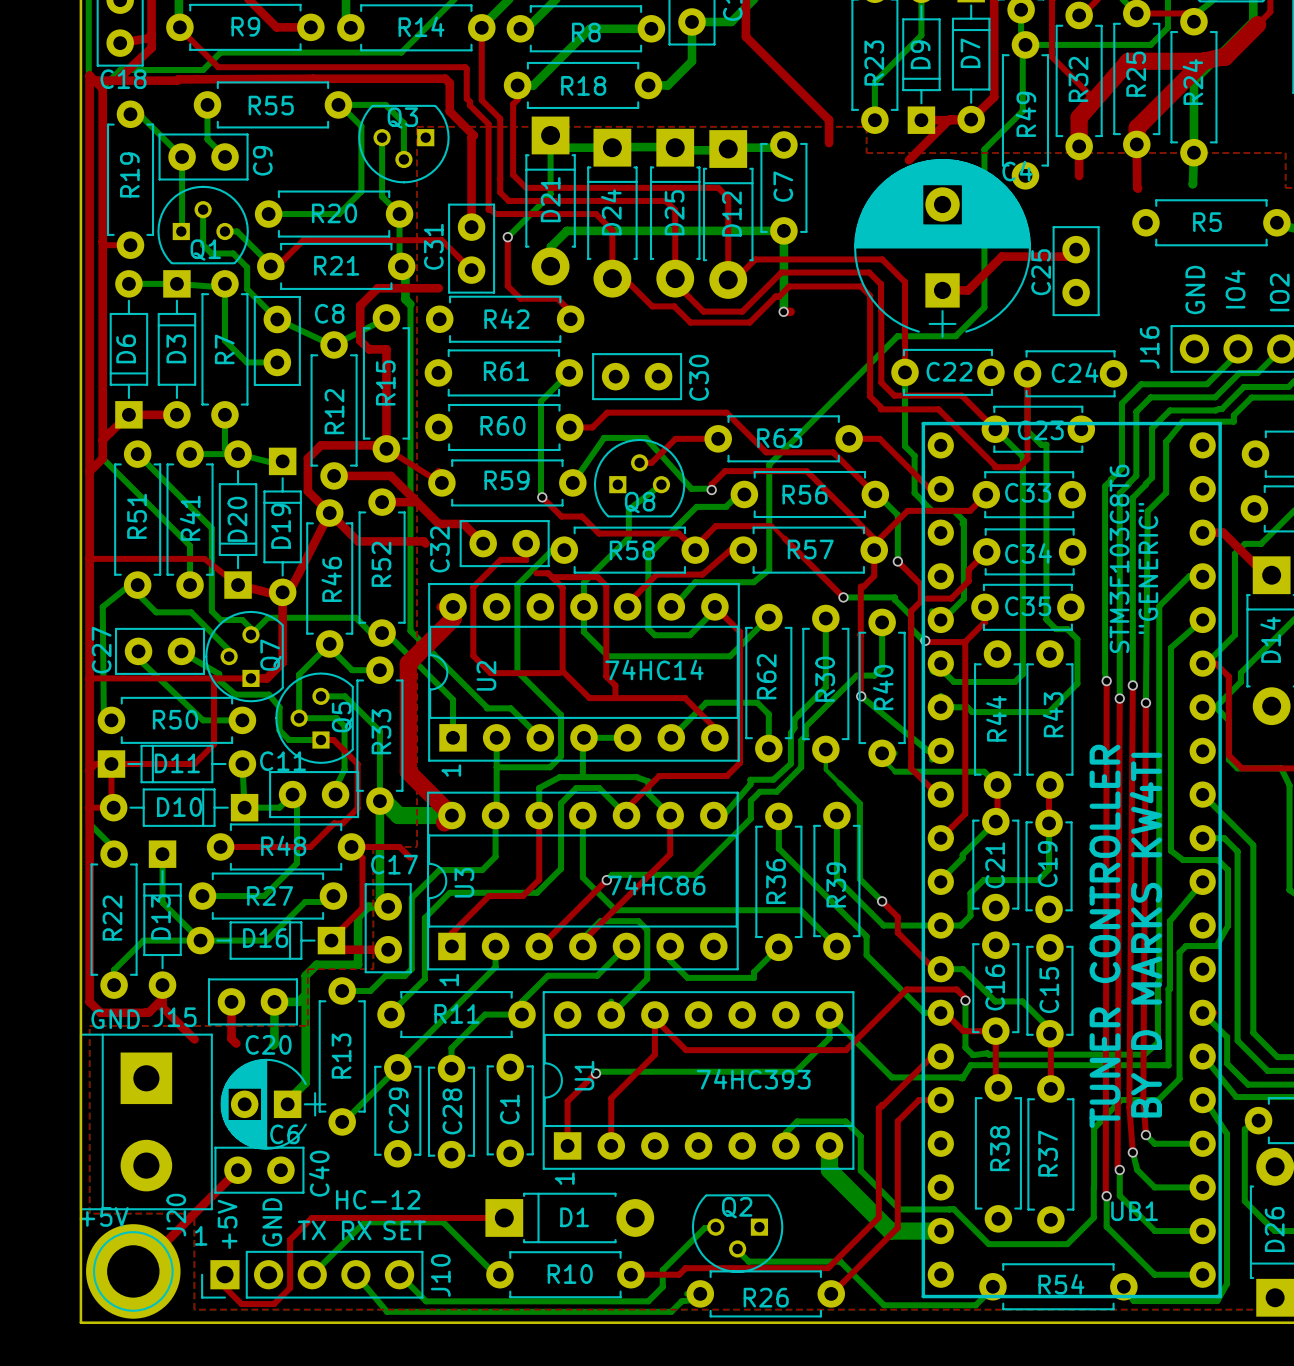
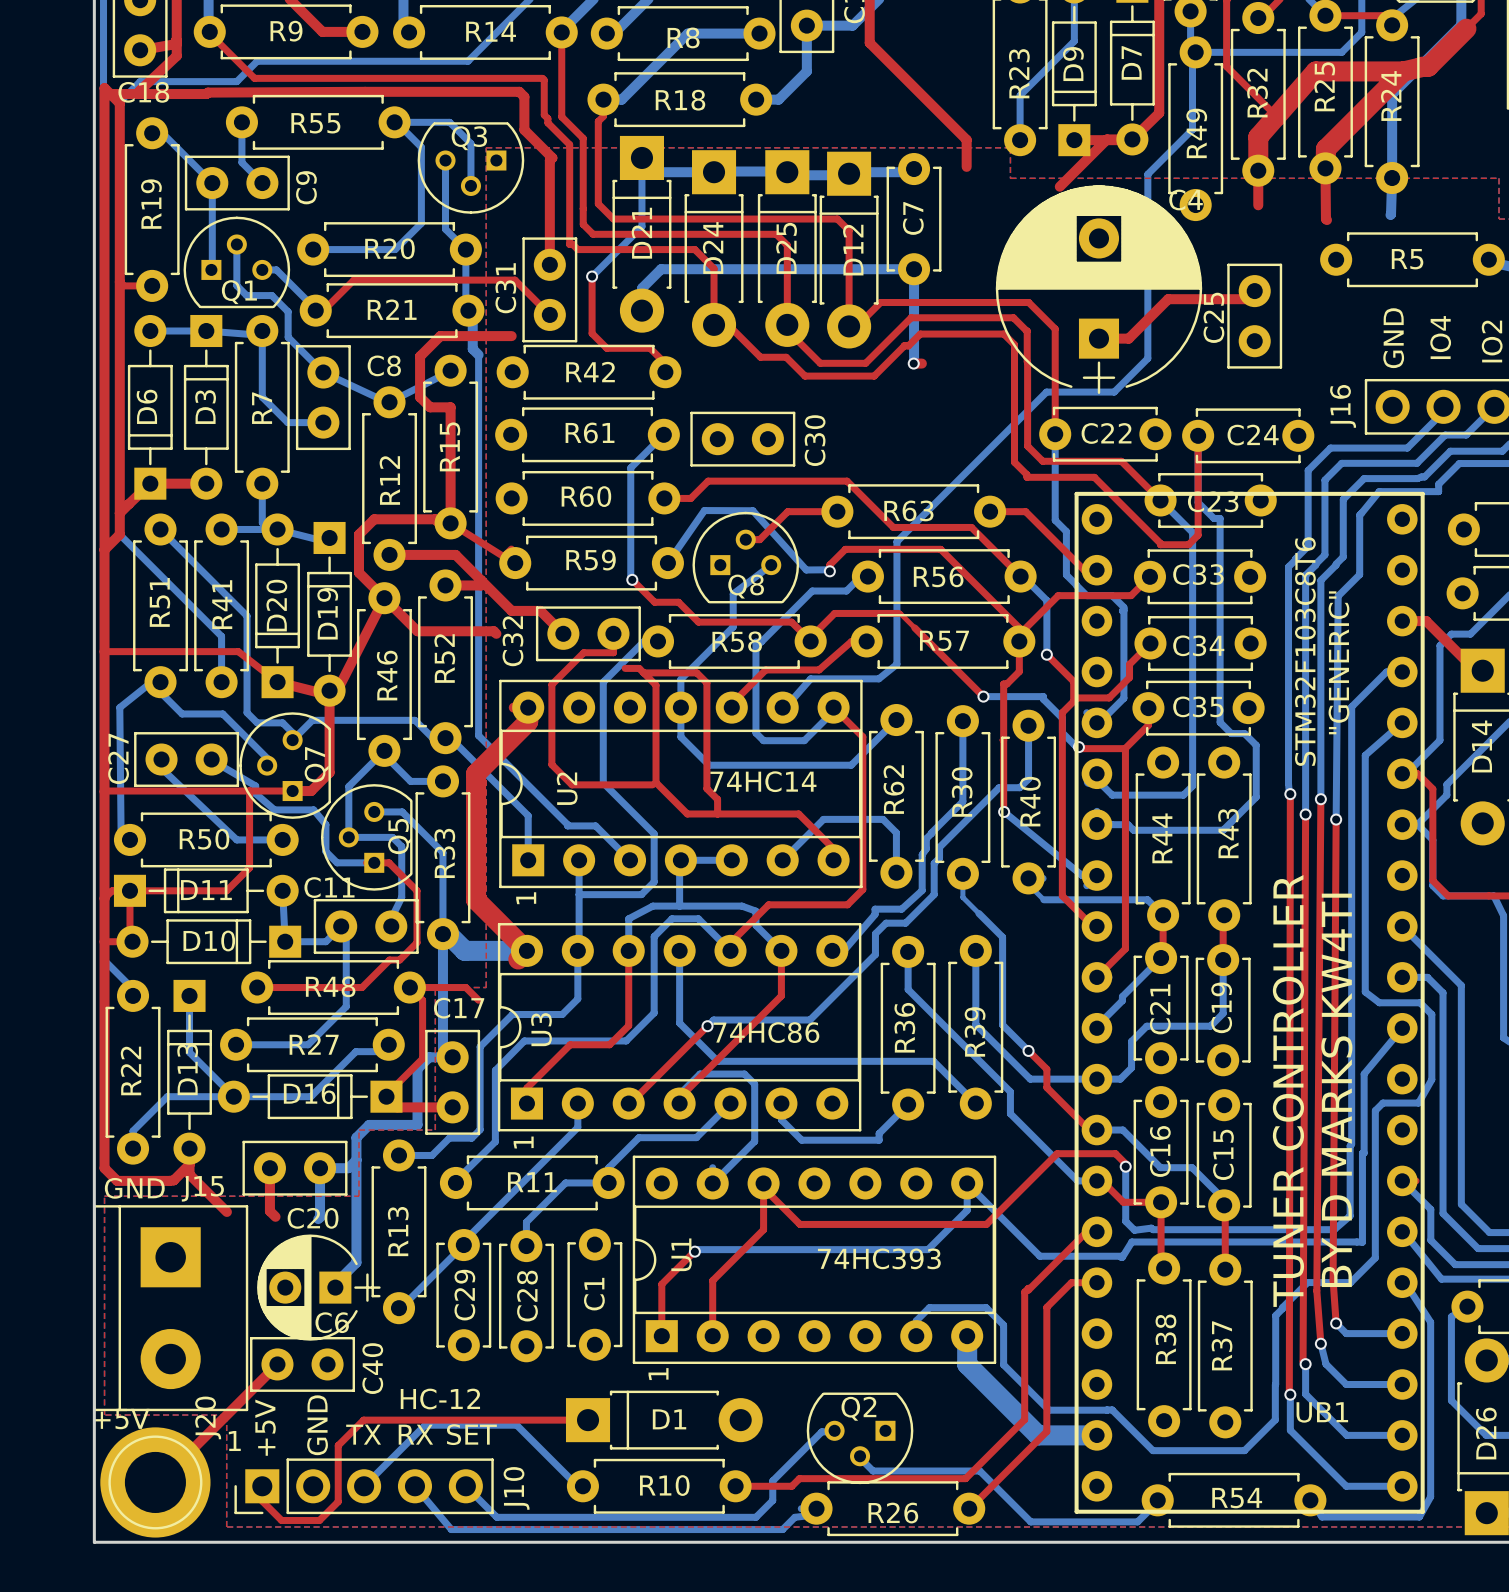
UB1 text: STM3F103C8T6 (1119, 558) -> STM32F103C8T6 (1305, 651)

